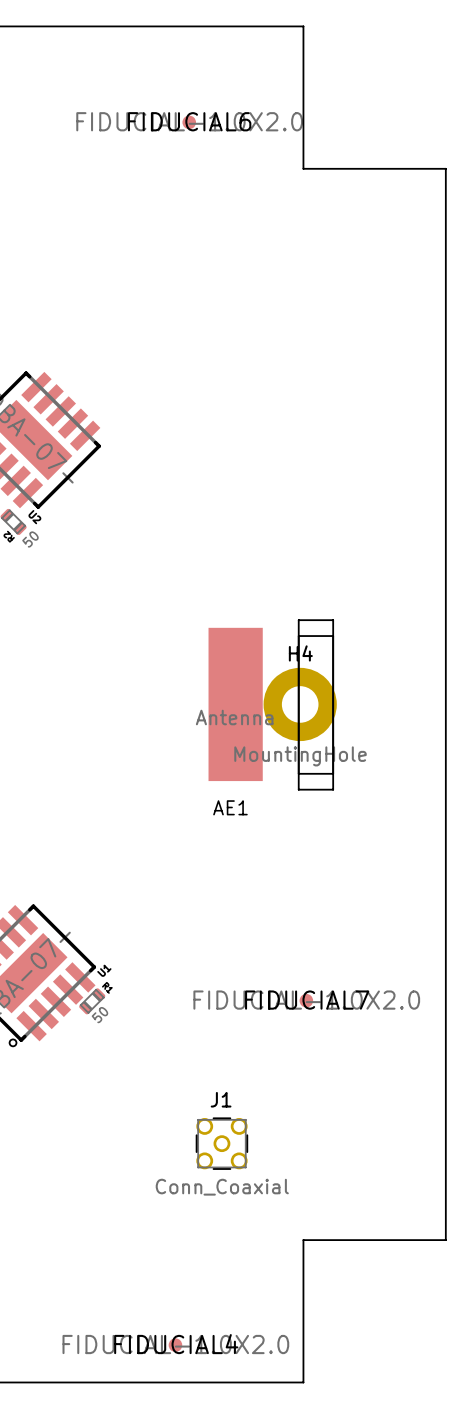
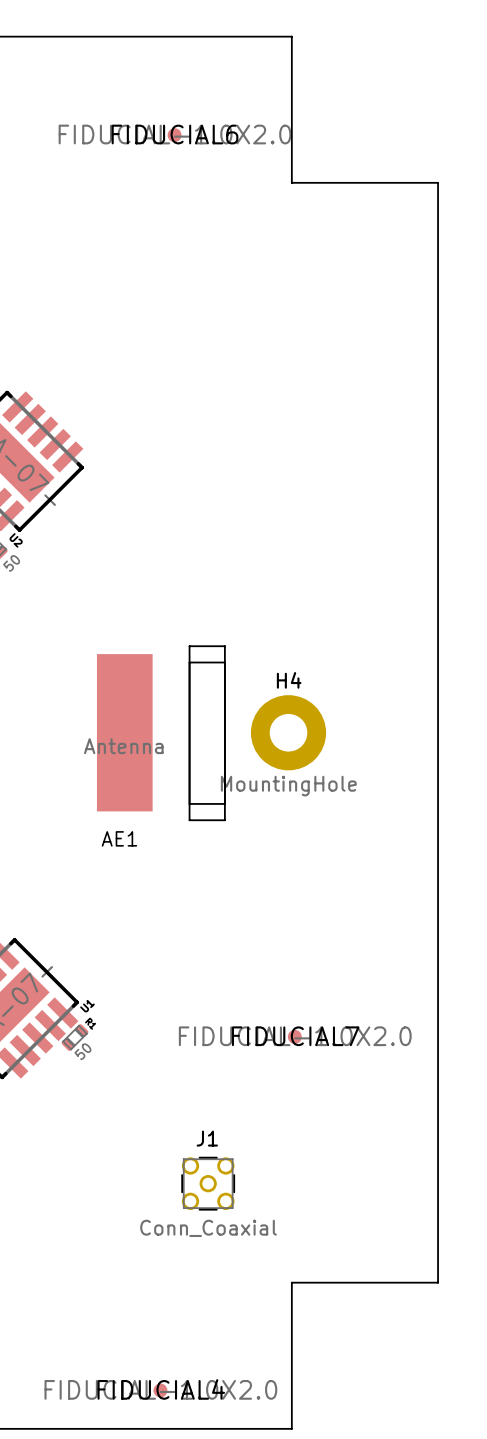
AE1 position: (271, 704) -> (161, 733)

